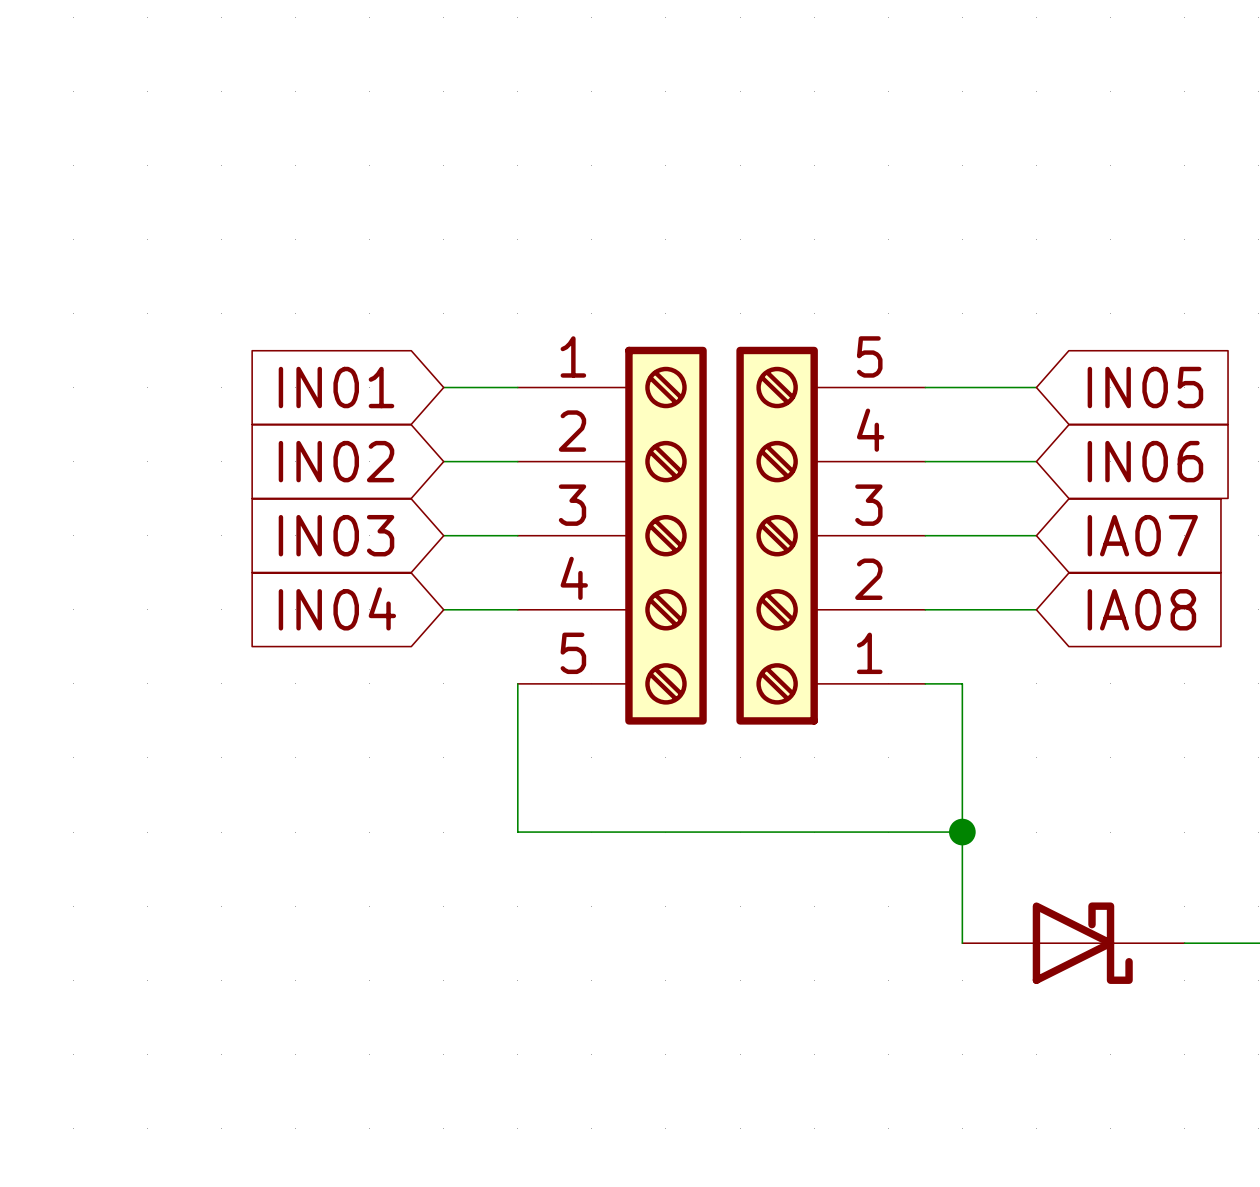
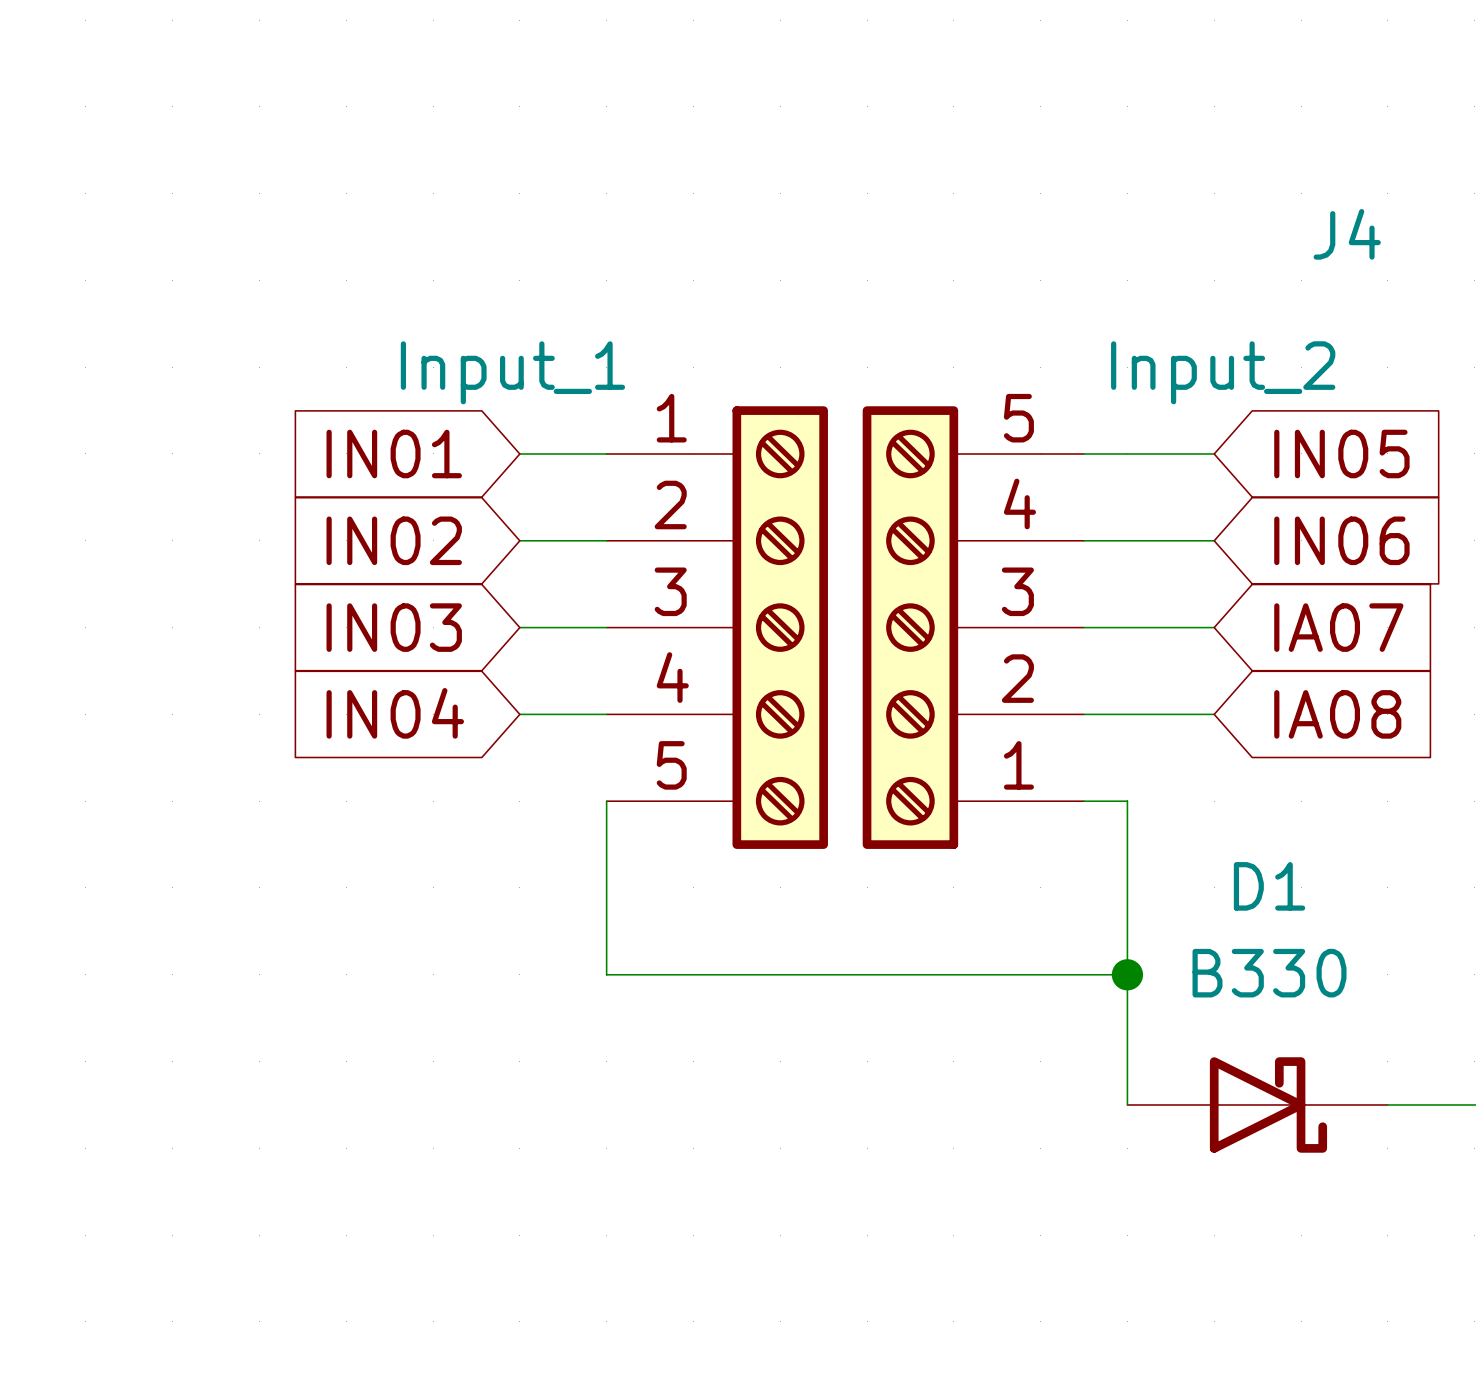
J4 name: none -> J4 (1347, 234)
part value: none -> Input_1 (512, 372)
J4 value: none -> Input_2 (1223, 372)
D1 name: none -> D1 (1269, 886)
D1 value: none -> B330 (1269, 973)

